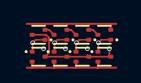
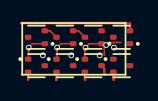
line: none -> (22, 23) (125, 23) (125, 74) (22, 74) (22, 23)
track: (108, 23) (116, 23) -> none
track: (88, 29) (92, 29) (97, 34) -> none
track: (32, 34) (46, 34) (49, 37) (49, 52) (45, 56) (110, 56) (109, 48) -> none
track: none -> (120, 42) (108, 42) (104, 46) (104, 55)
track: (110, 39) (101, 39) (98, 42) (97, 51) -> none
via position: (109, 48) -> (106, 45)
track: none -> (104, 68) (104, 74)
track: (26, 67) (116, 67) -> none

